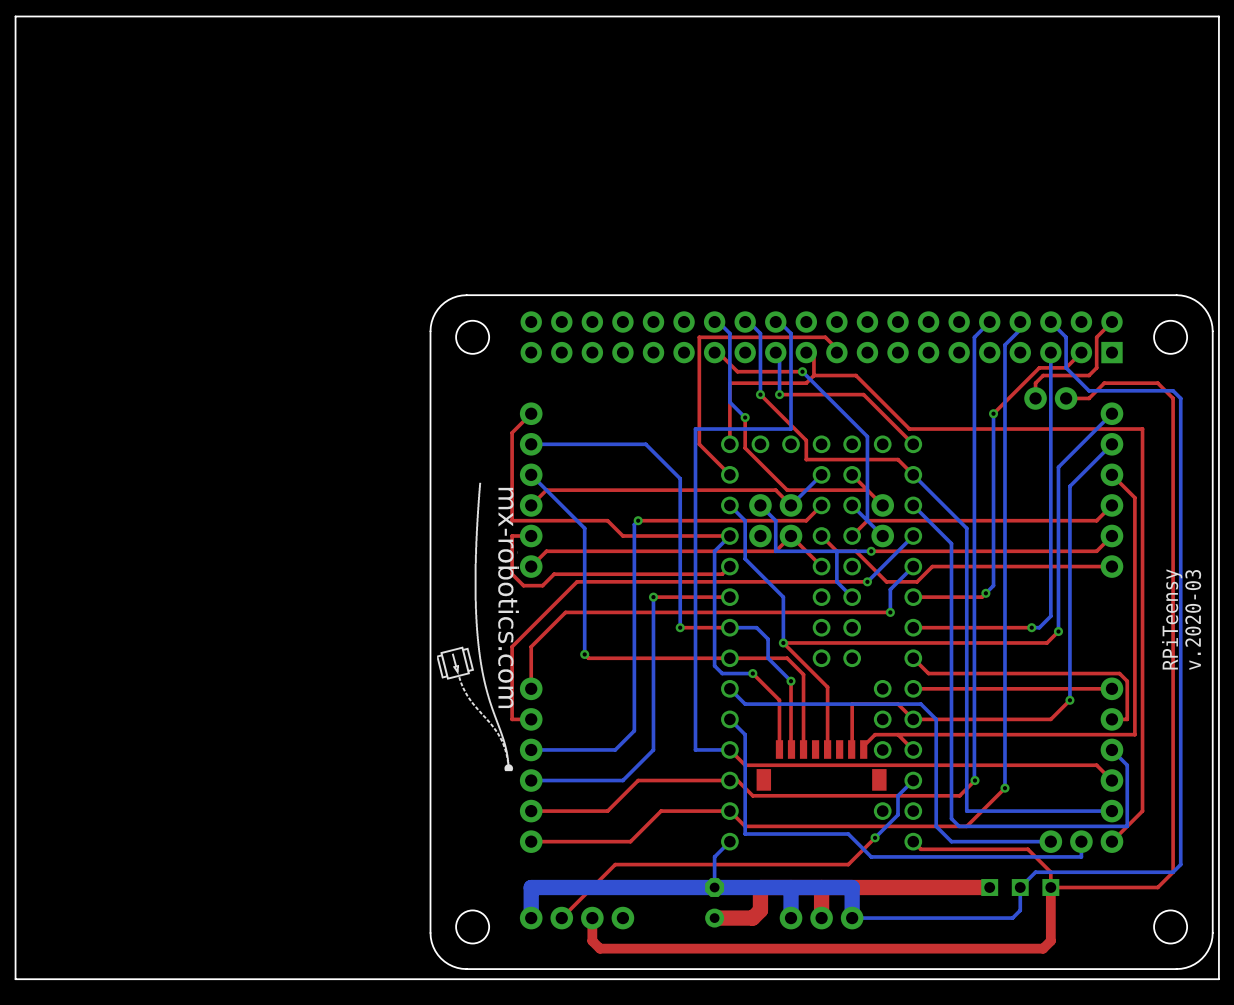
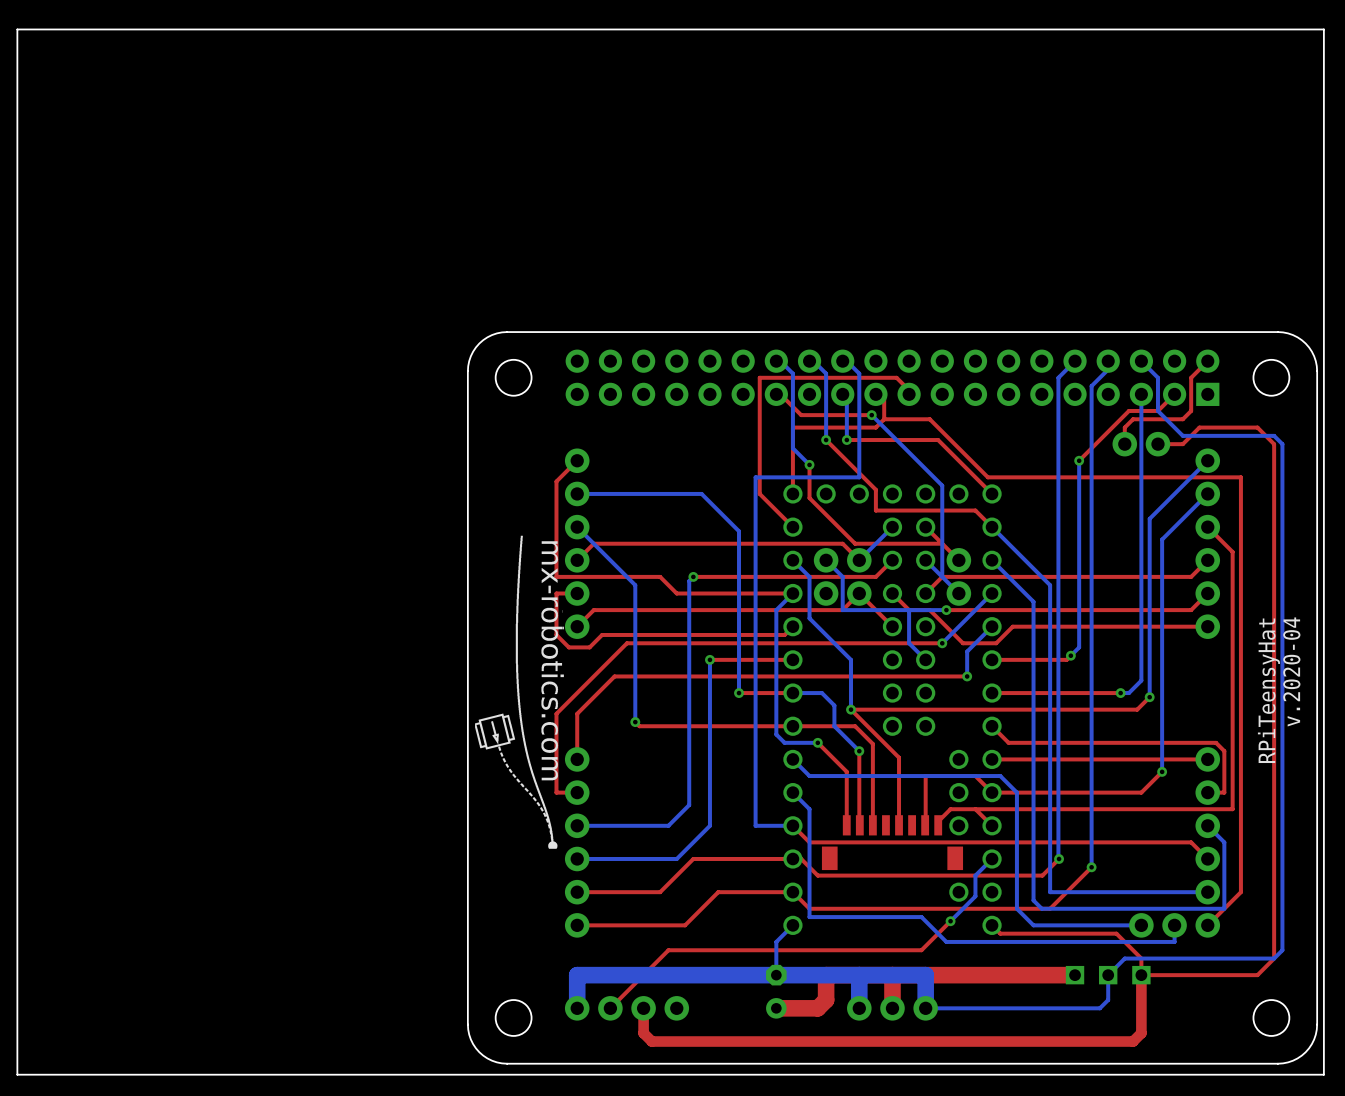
text: RPiTeensy (1172, 619) -> RPiTeensyHat (1268, 690)
text: v.2020-03 (1193, 619) -> v.2020-04 (1291, 671)

